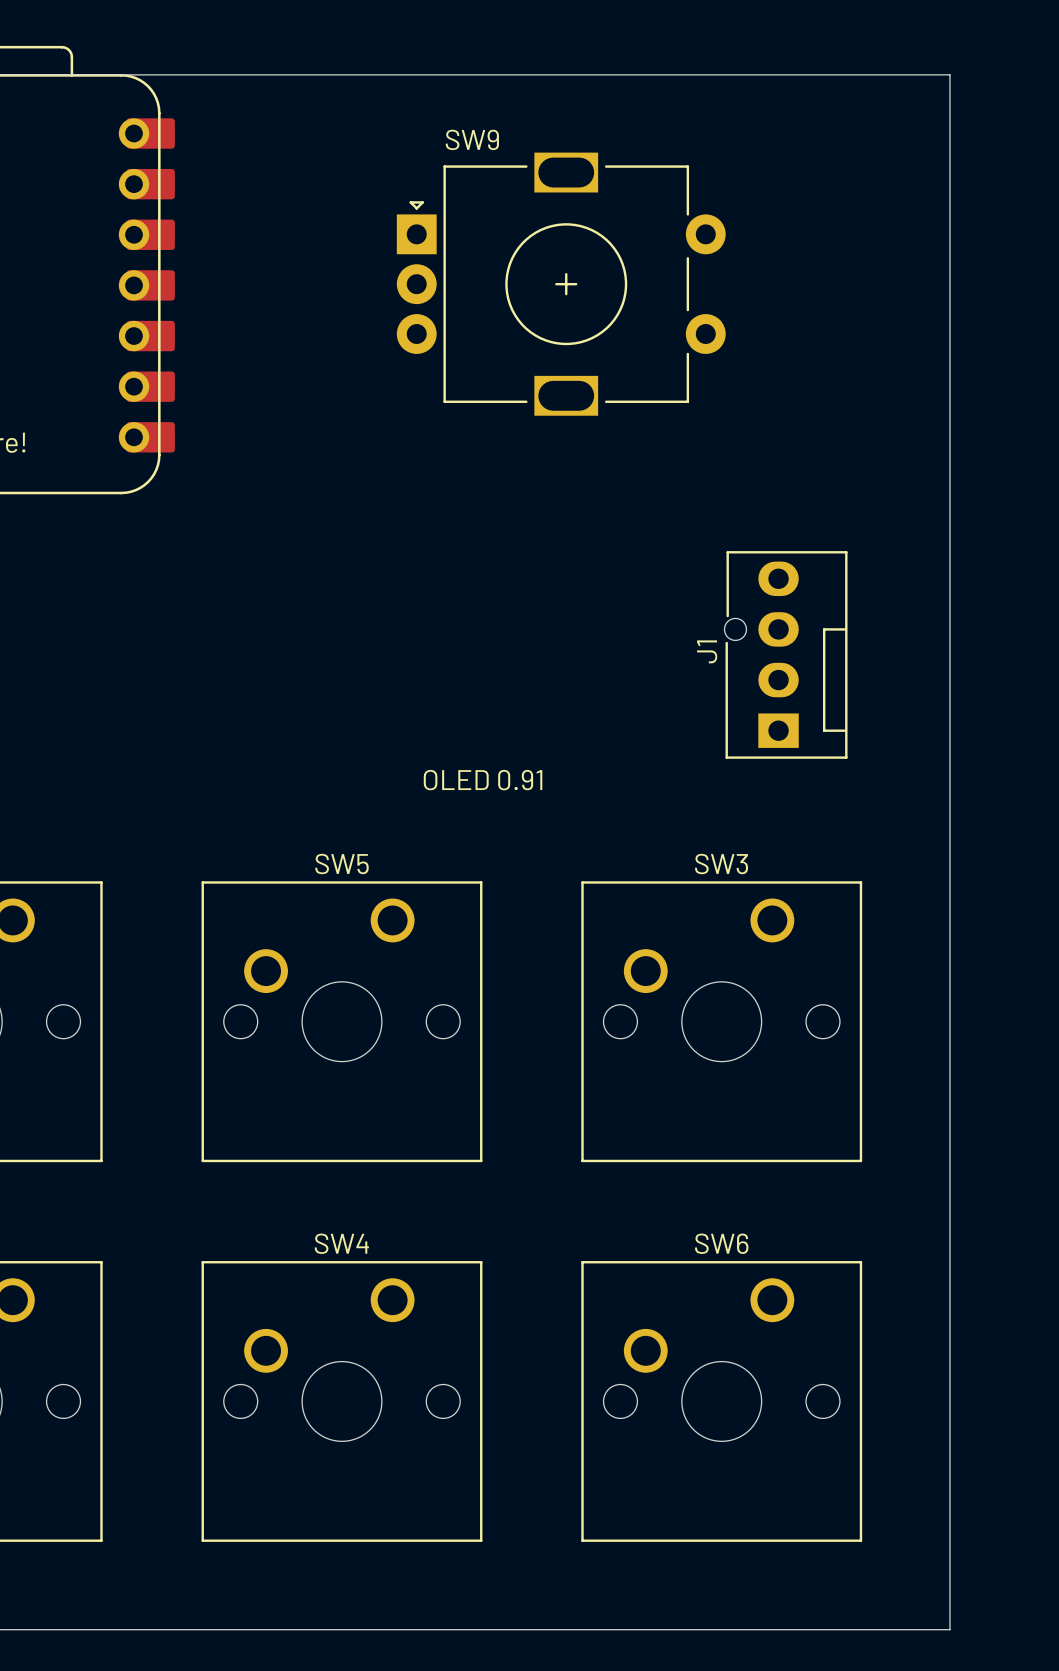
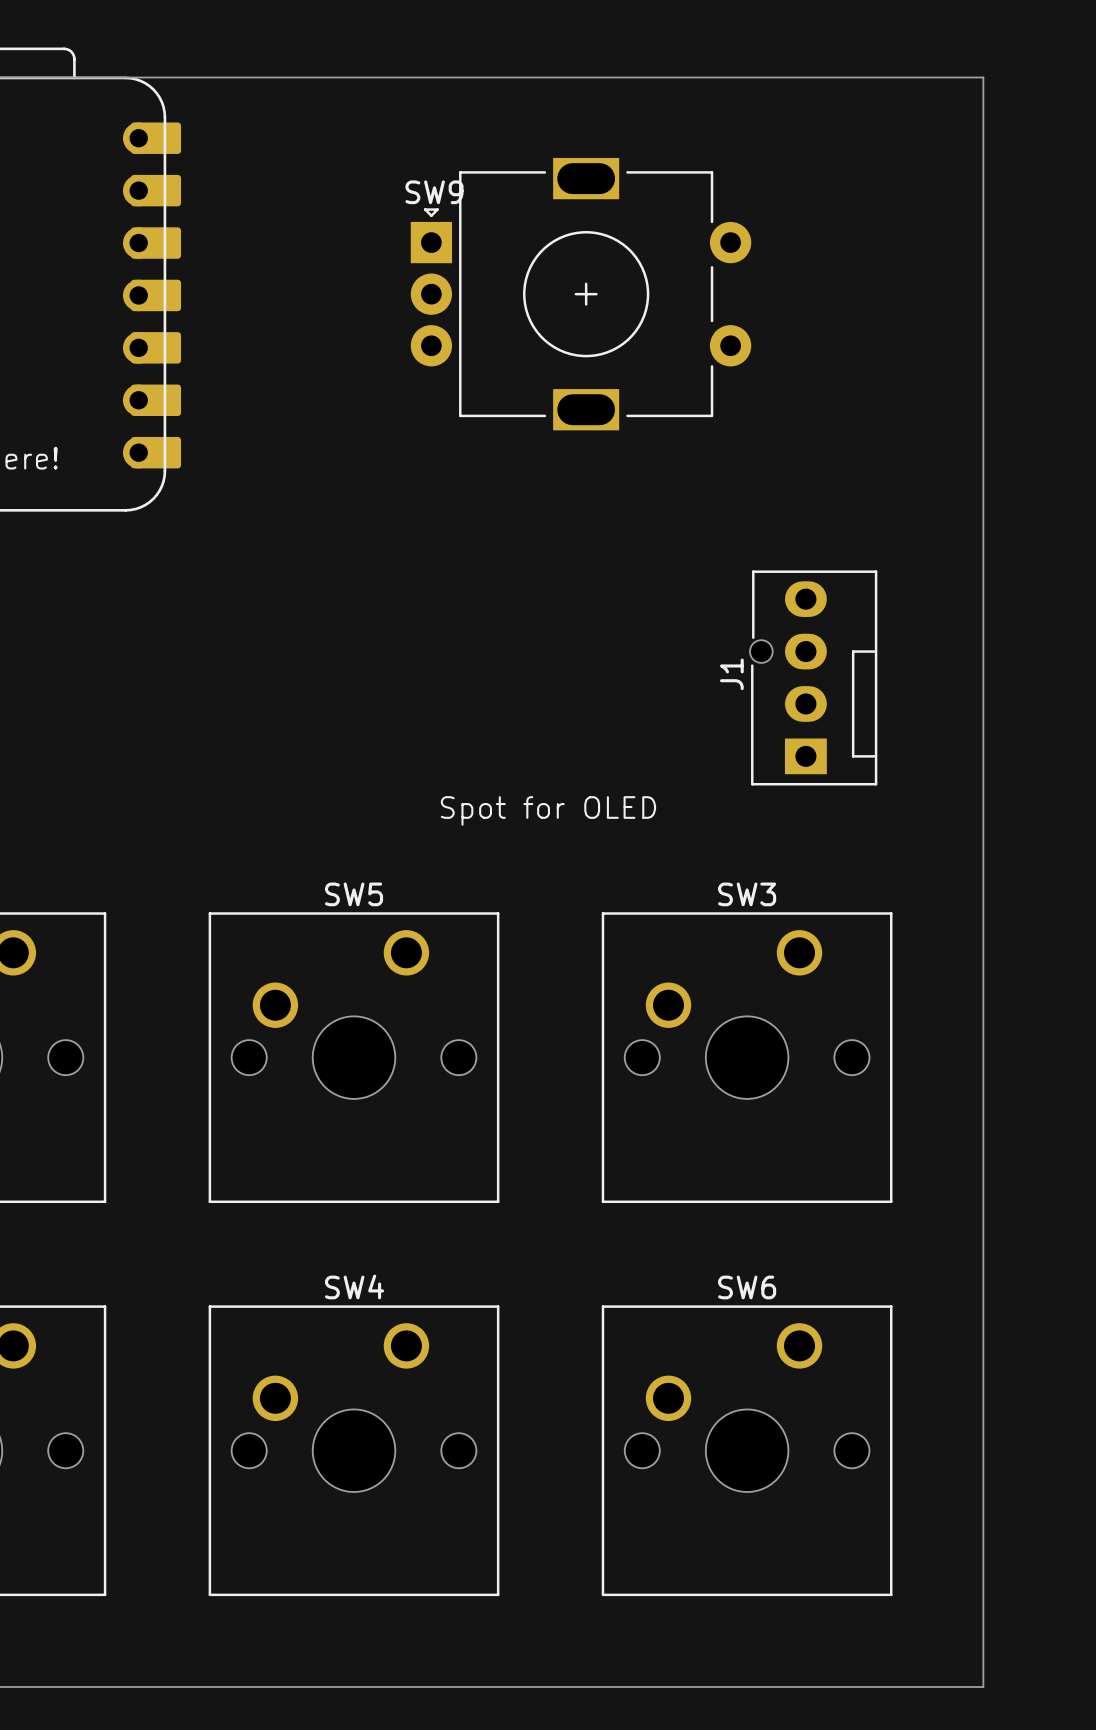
SW9 name position: SW9 (472, 139) -> SW9 (434, 192)
text: OLED 0.91 (483, 780) -> Spot for OLED (548, 810)

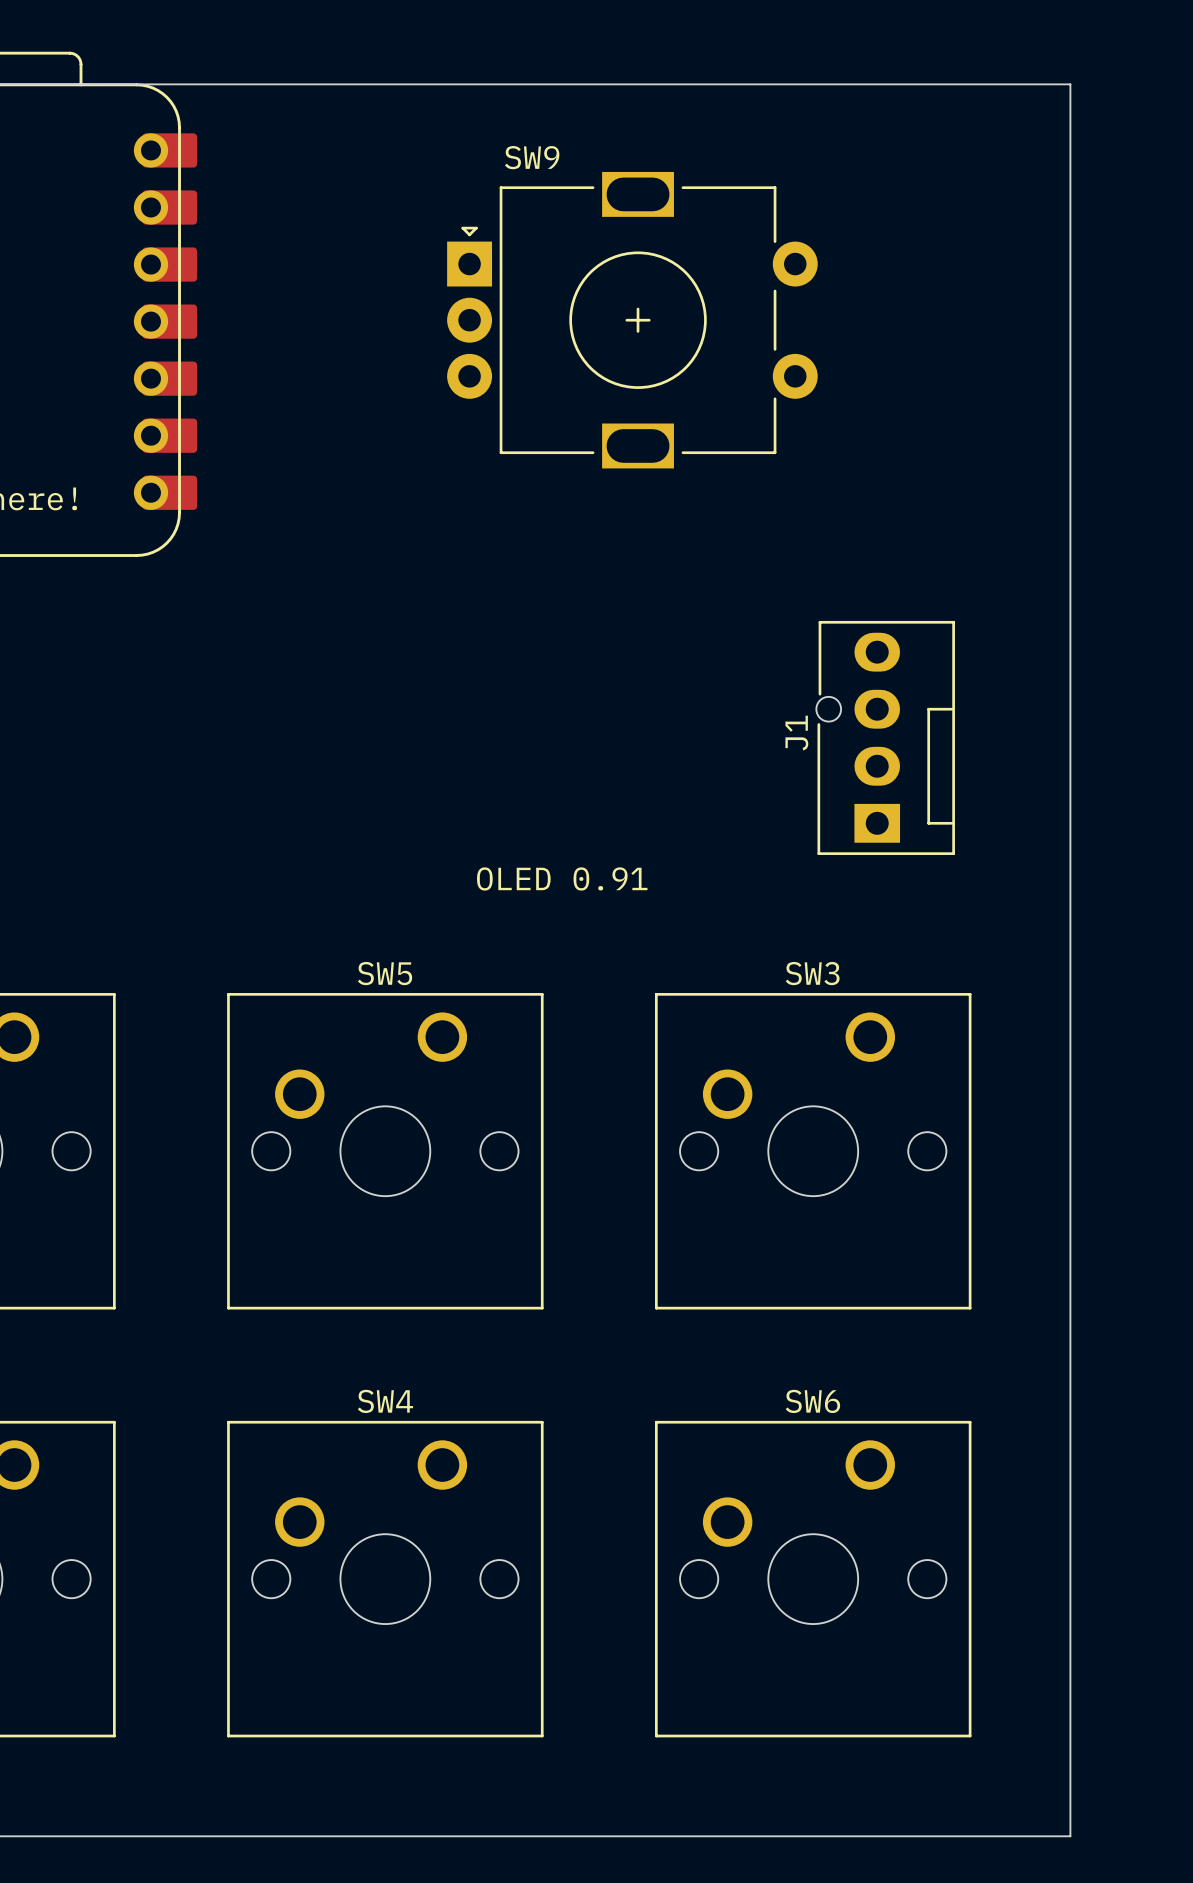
SW9 name position: SW9 (434, 192) -> SW9 (532, 157)
text: Spot for OLED (548, 810) -> OLED 0.91 (562, 878)

